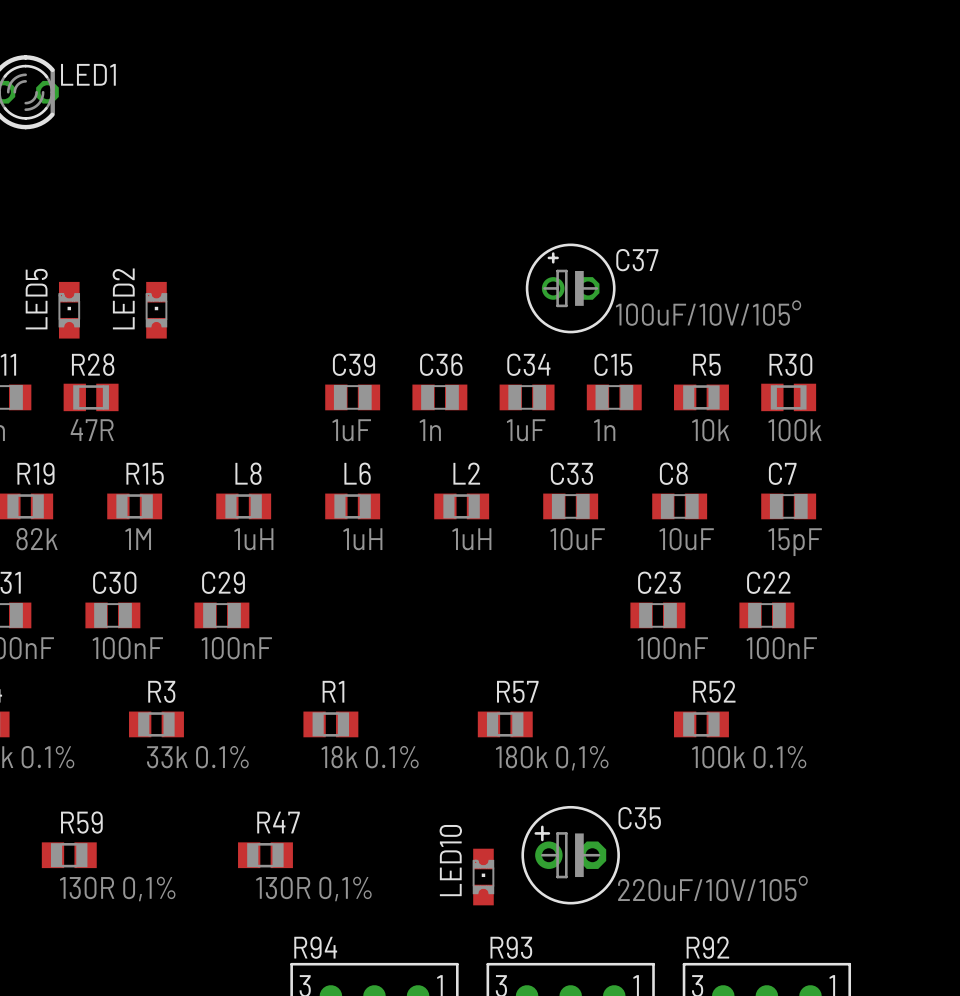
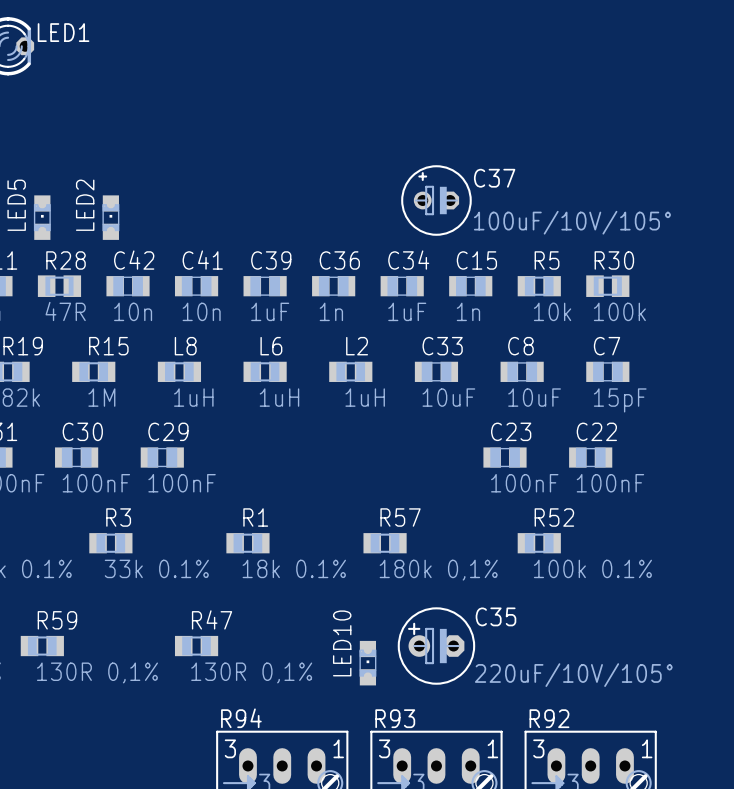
C42: none -> 10n (128, 286)
C41: none -> 10n (196, 286)

